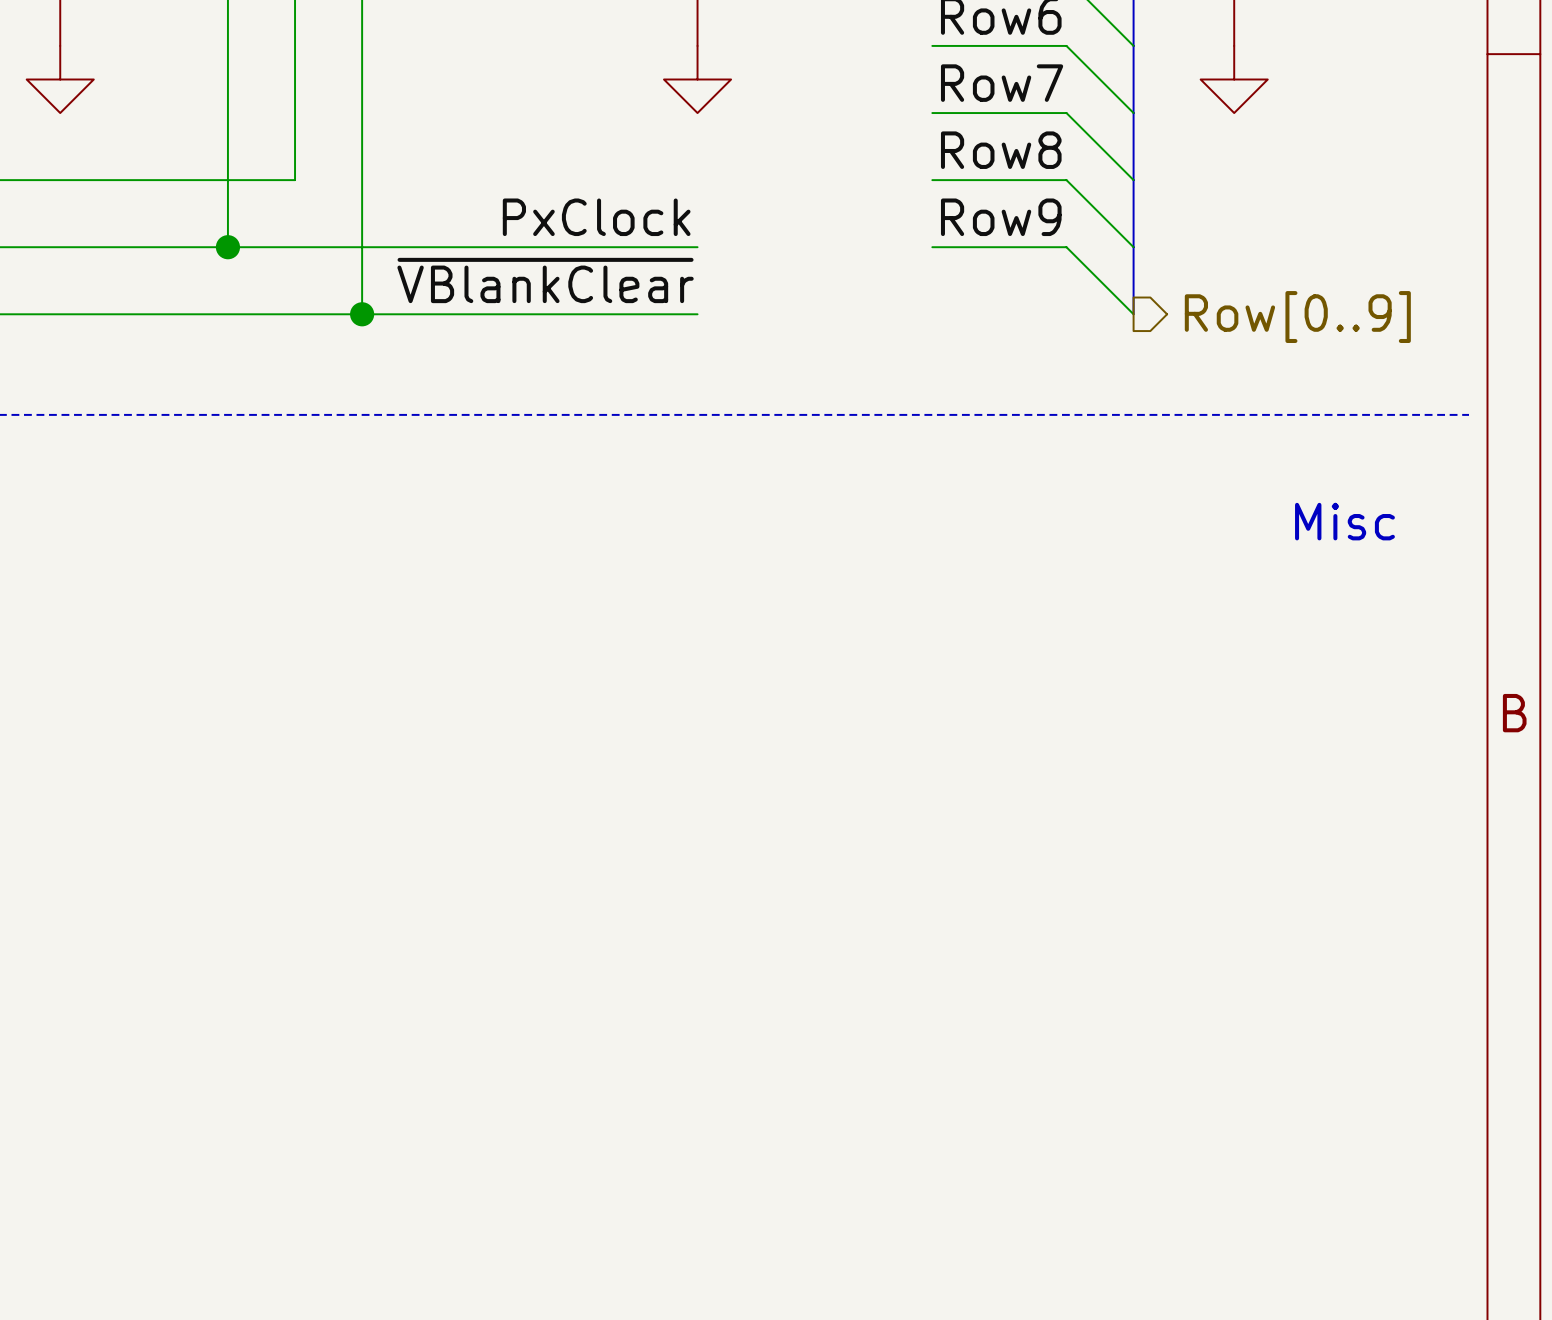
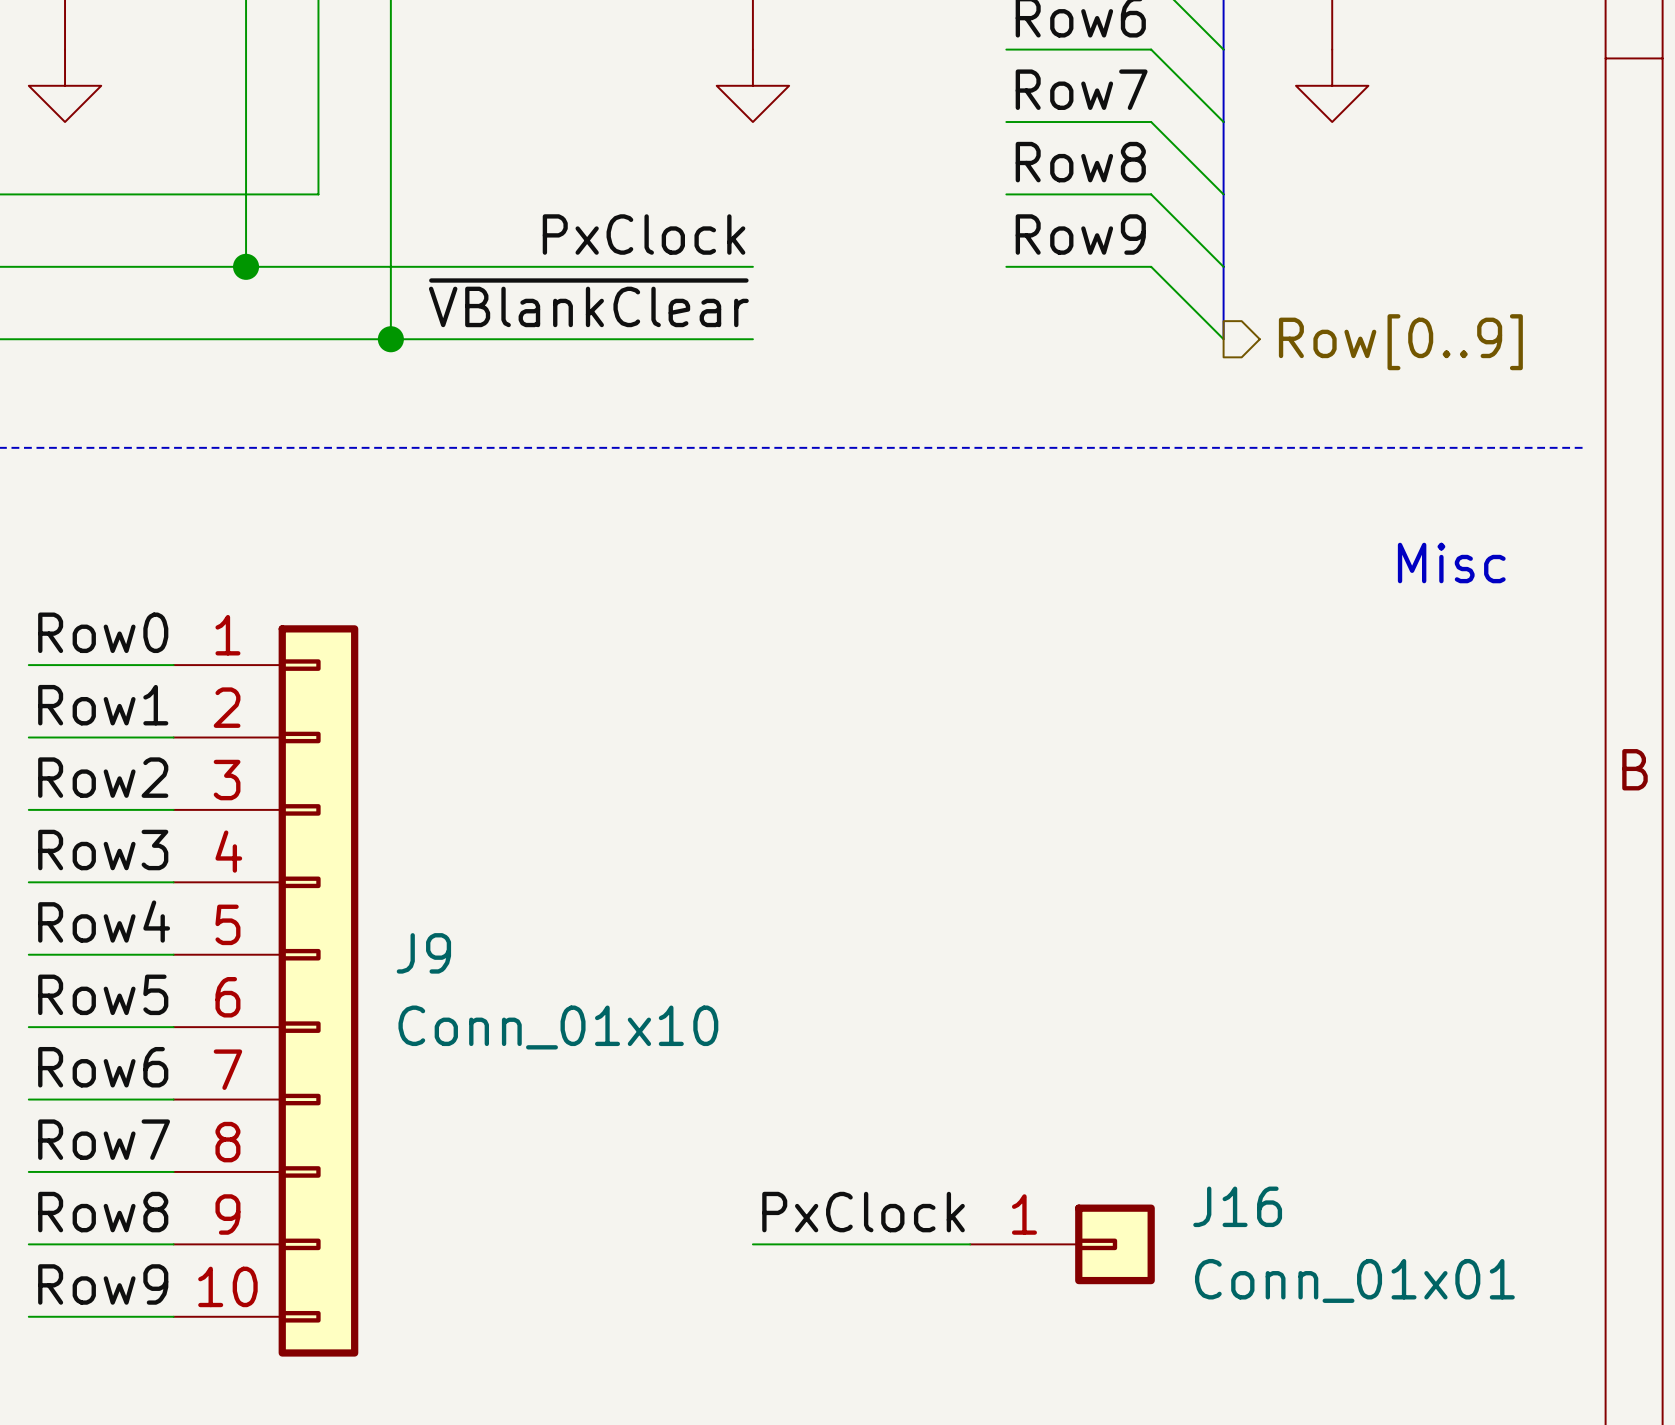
label: none -> Row0 (103, 632)
wire: none -> (28, 665) (173, 665)
label: none -> Row1 (103, 705)
wire: none -> (28, 737) (173, 737)
label: none -> Row2 (103, 777)
wire: none -> (28, 809) (173, 809)
label: none -> Row3 (103, 850)
wire: none -> (28, 882) (173, 882)
label: none -> Row4 (104, 921)
wire: none -> (28, 954) (173, 954)
J9: none -> Conn_01x10 (265, 990)
label: none -> Row5 (103, 994)
wire: none -> (28, 1027) (173, 1027)
label: none -> Row6 (103, 1067)
wire: none -> (28, 1099) (173, 1099)
label: none -> Row7 (104, 1139)
wire: none -> (28, 1171) (173, 1171)
label: none -> Row8 (103, 1212)
label: none -> PxClock (863, 1212)
wire: none -> (28, 1244) (173, 1244)
wire: none -> (752, 1244) (970, 1244)
J16: none -> Conn_01x01 (1062, 1244)
label: none -> Row9 (103, 1284)
wire: none -> (28, 1316) (173, 1316)

